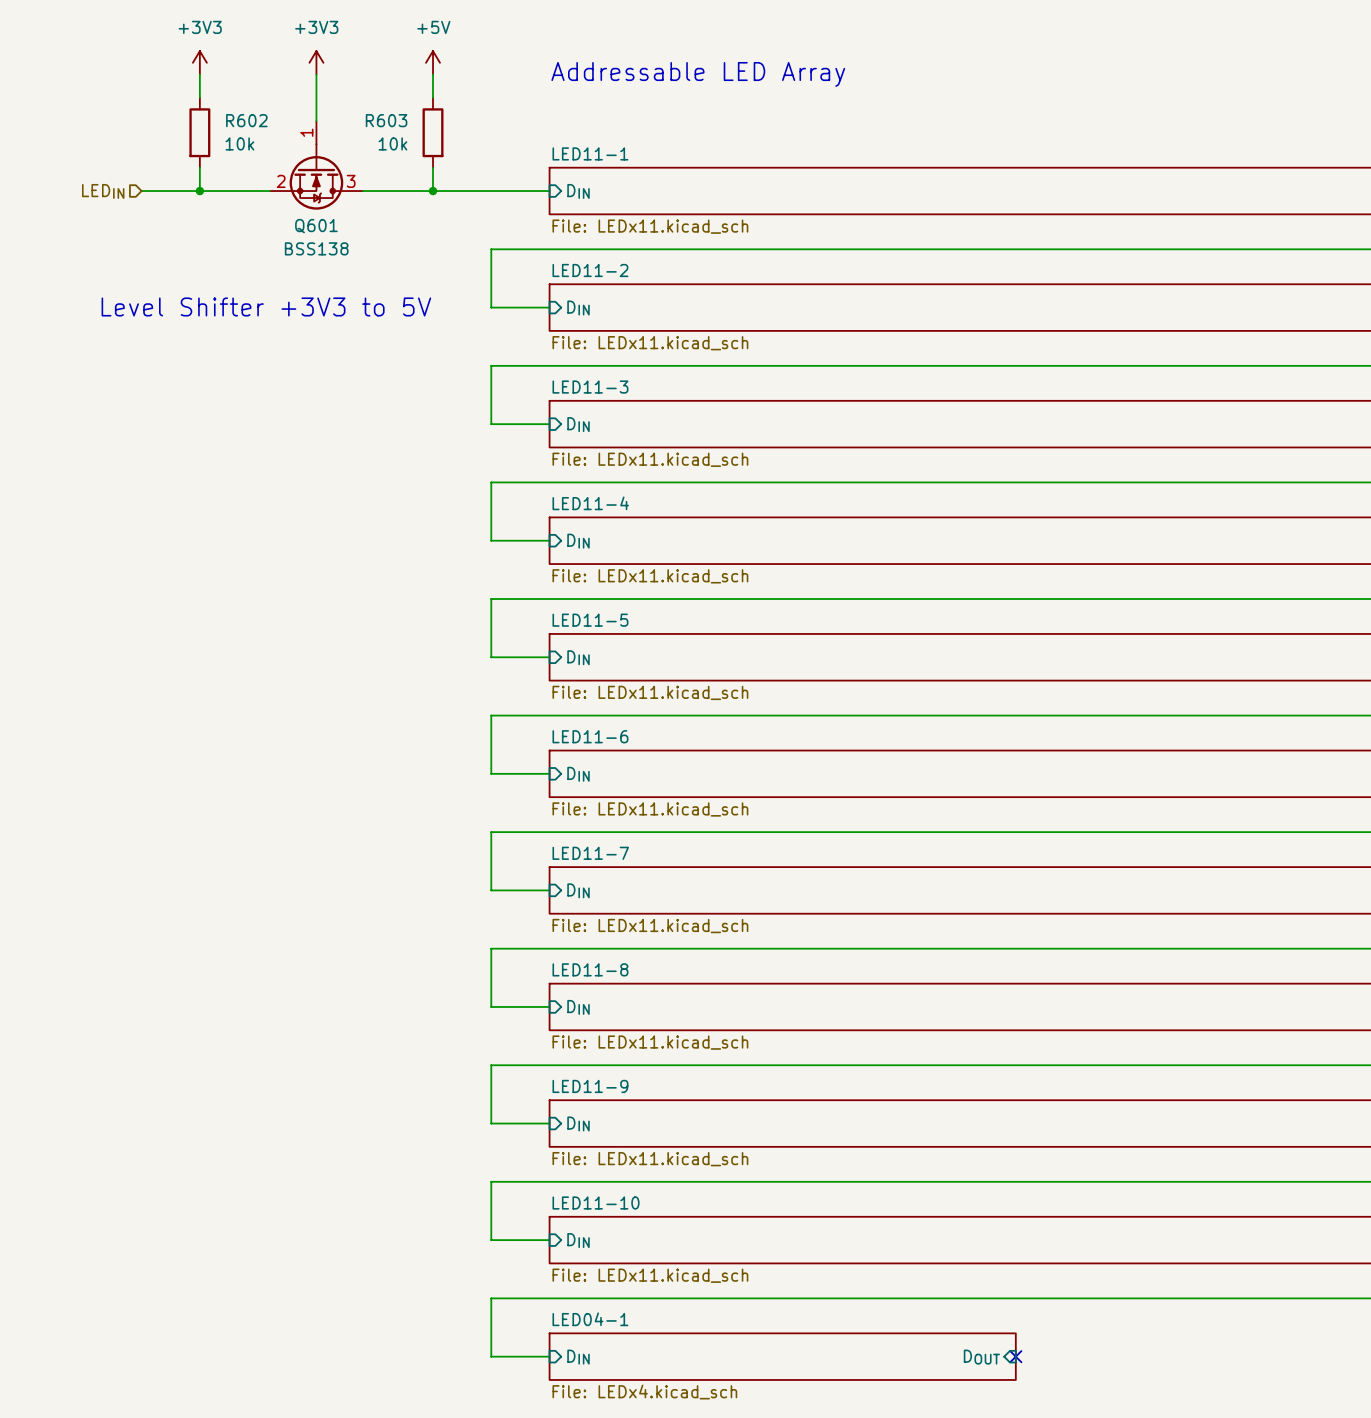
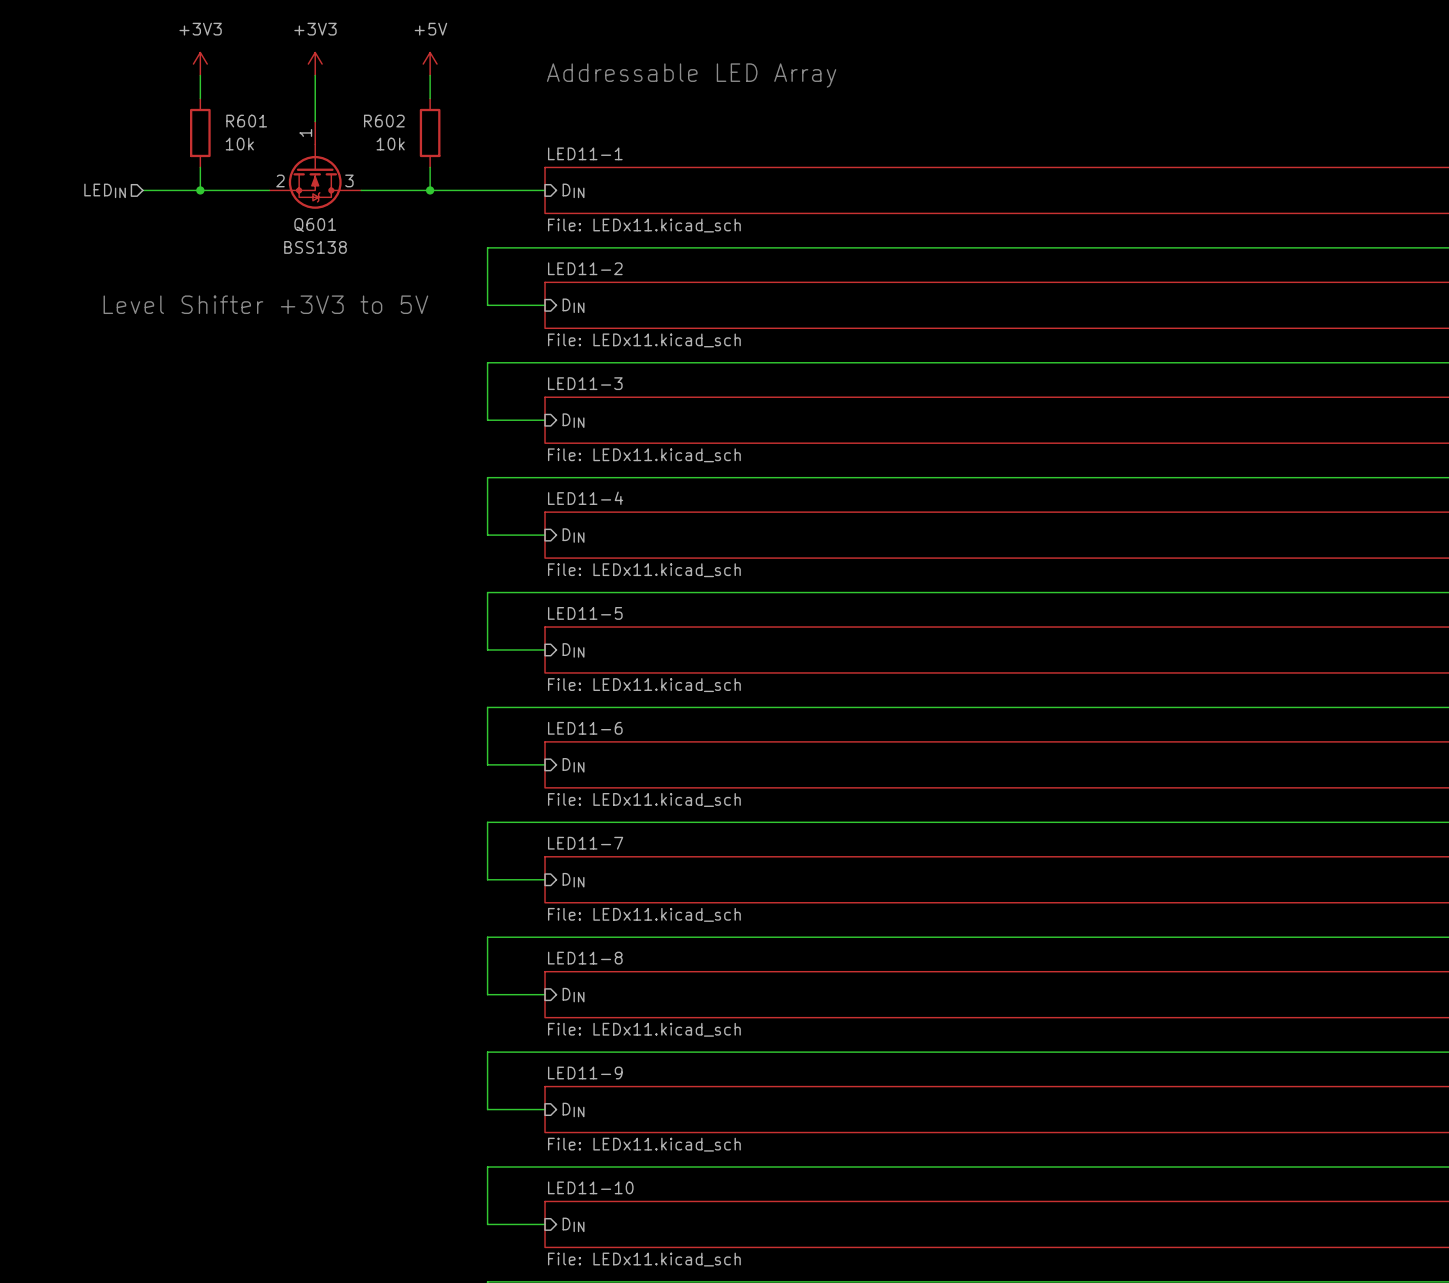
R602 name: R602 (246, 120) -> R601 (246, 121)
R603 name: R603 (386, 120) -> R602 (384, 121)

